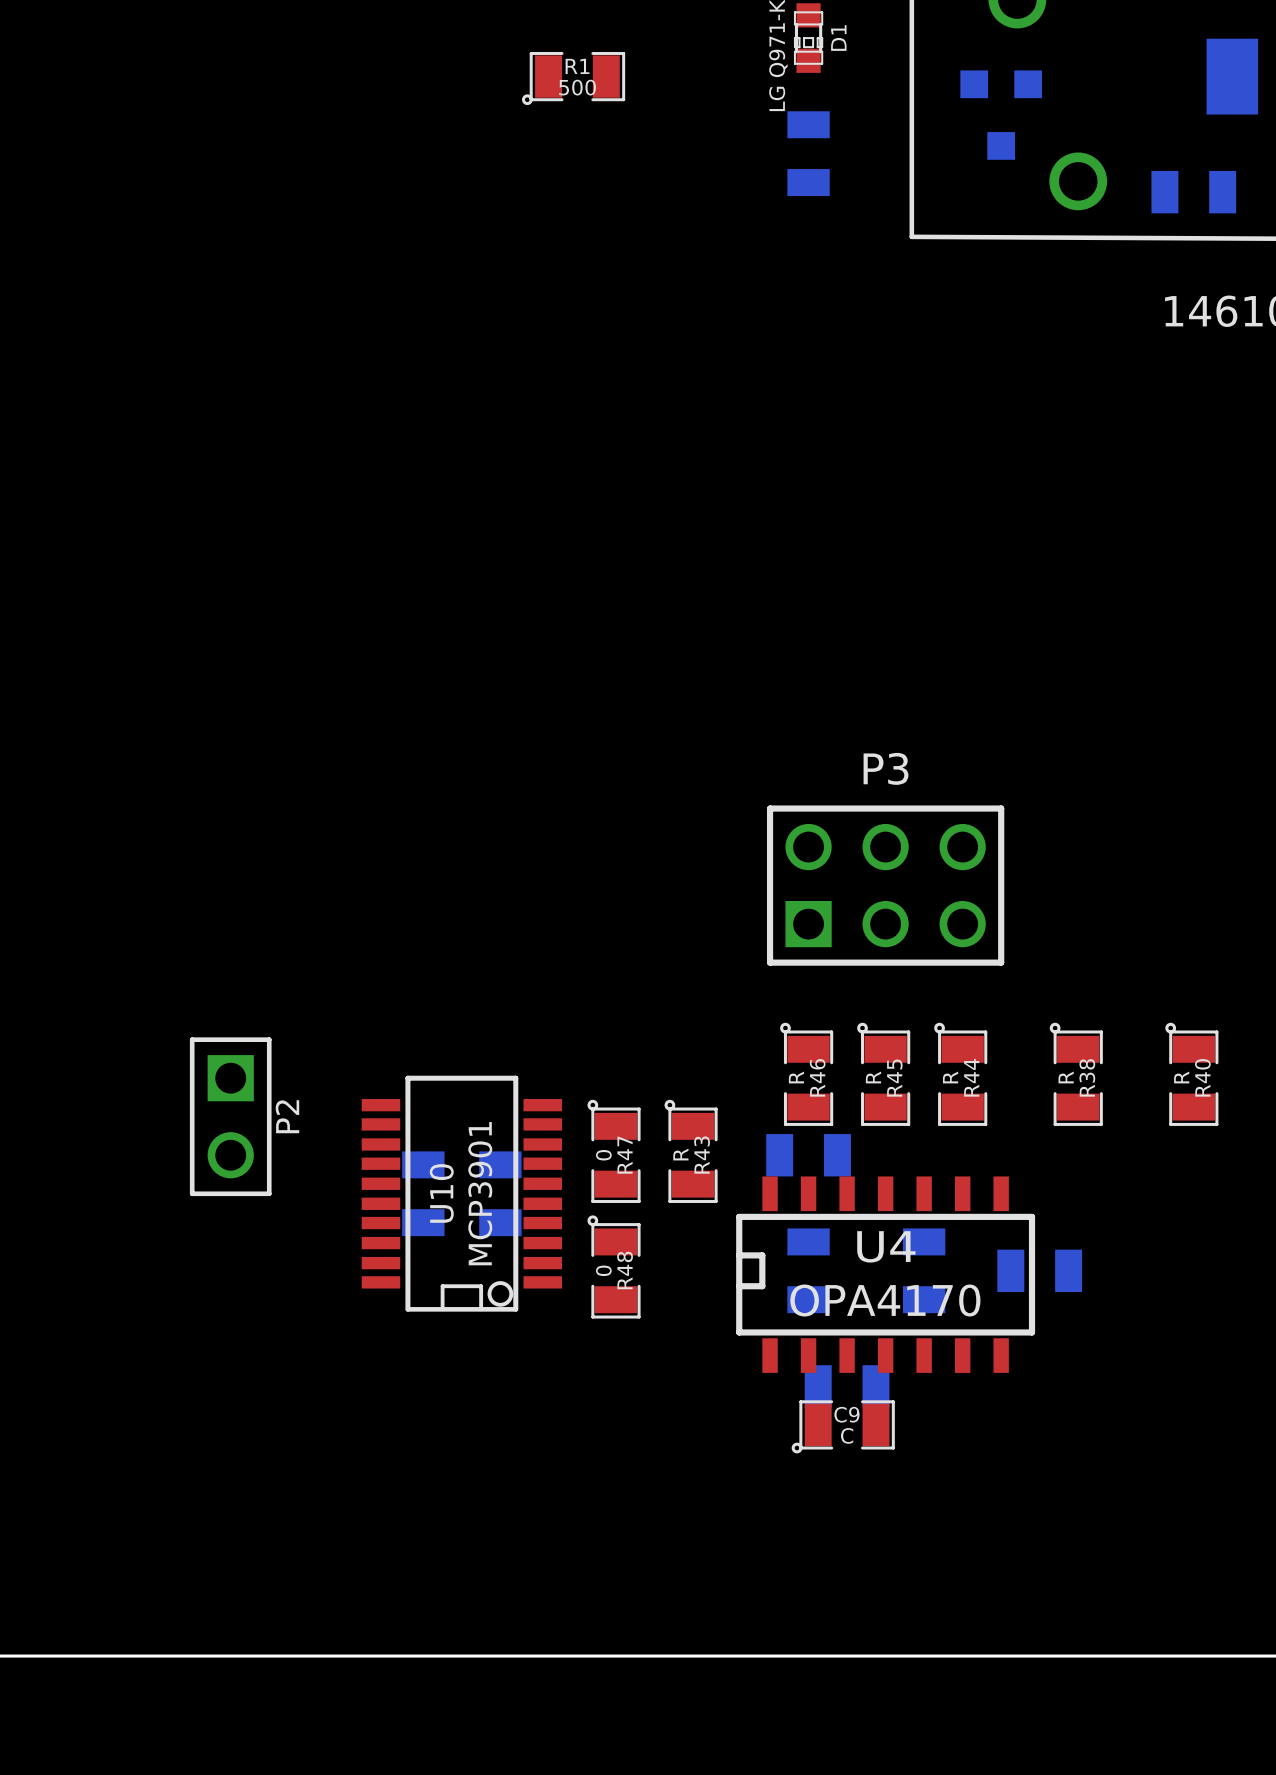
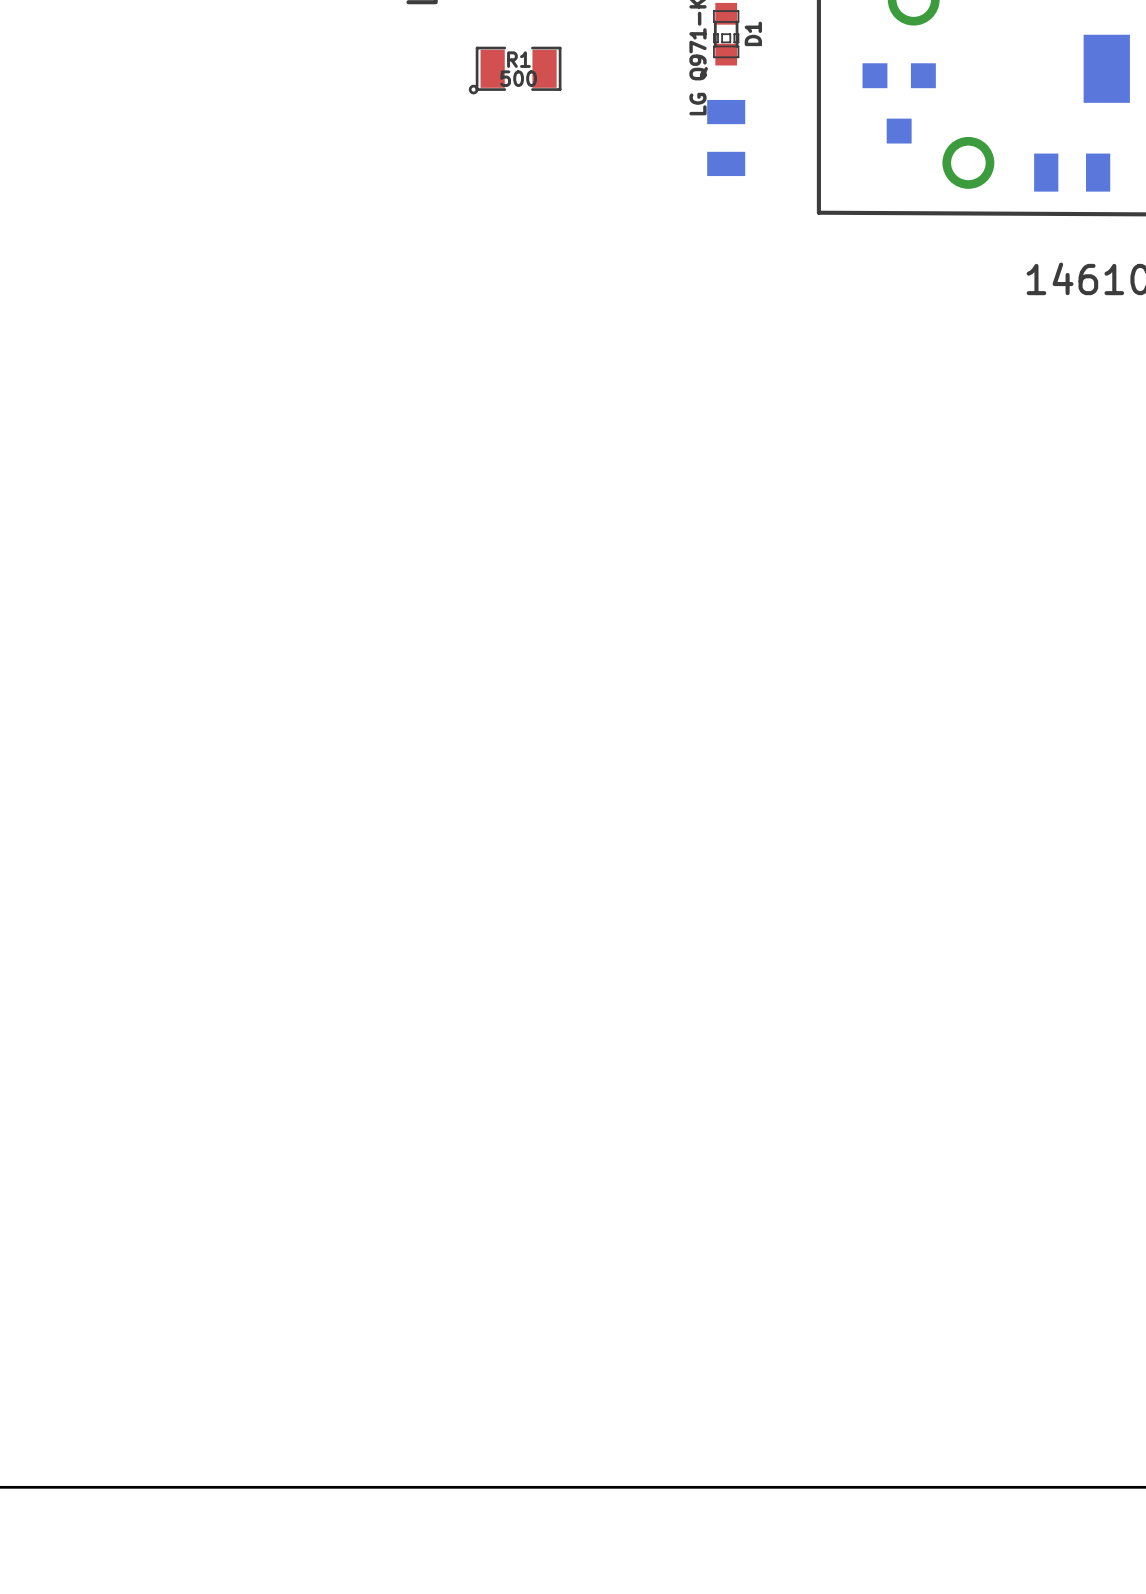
P3: (885, 885) -> none
R46: R (806, 1074) -> none
R45: R (883, 1074) -> none
R44: R (960, 1074) -> none
R38: R (1076, 1074) -> none
R40: R (1191, 1074) -> none
P2: (230, 1116) -> none
R47: 0 (614, 1151) -> none
R43: R (691, 1151) -> none
part: (808, 1155) -> none
part: (423, 1193) -> none
U10: MCP3901 (461, 1193) -> none
part: (500, 1193) -> none
R48: 0 (614, 1266) -> none
part: (808, 1270) -> none
part: (924, 1270) -> none
part: (1039, 1270) -> none
U4: OPA4170 (885, 1274) -> none
part: (847, 1386) -> none
C9: C (843, 1426) -> none

